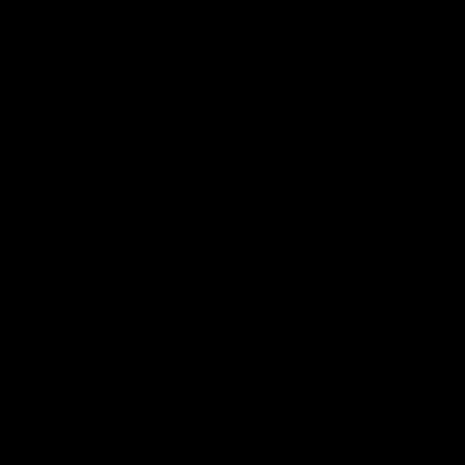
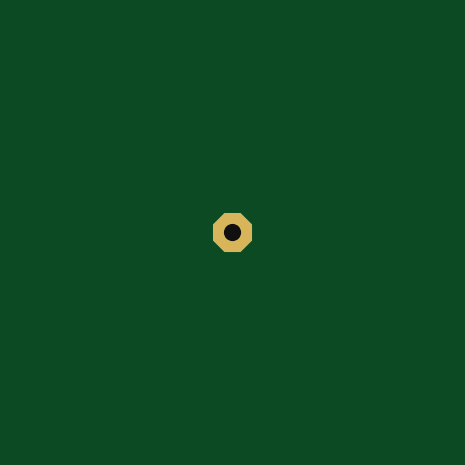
part: none -> (232, 232)

